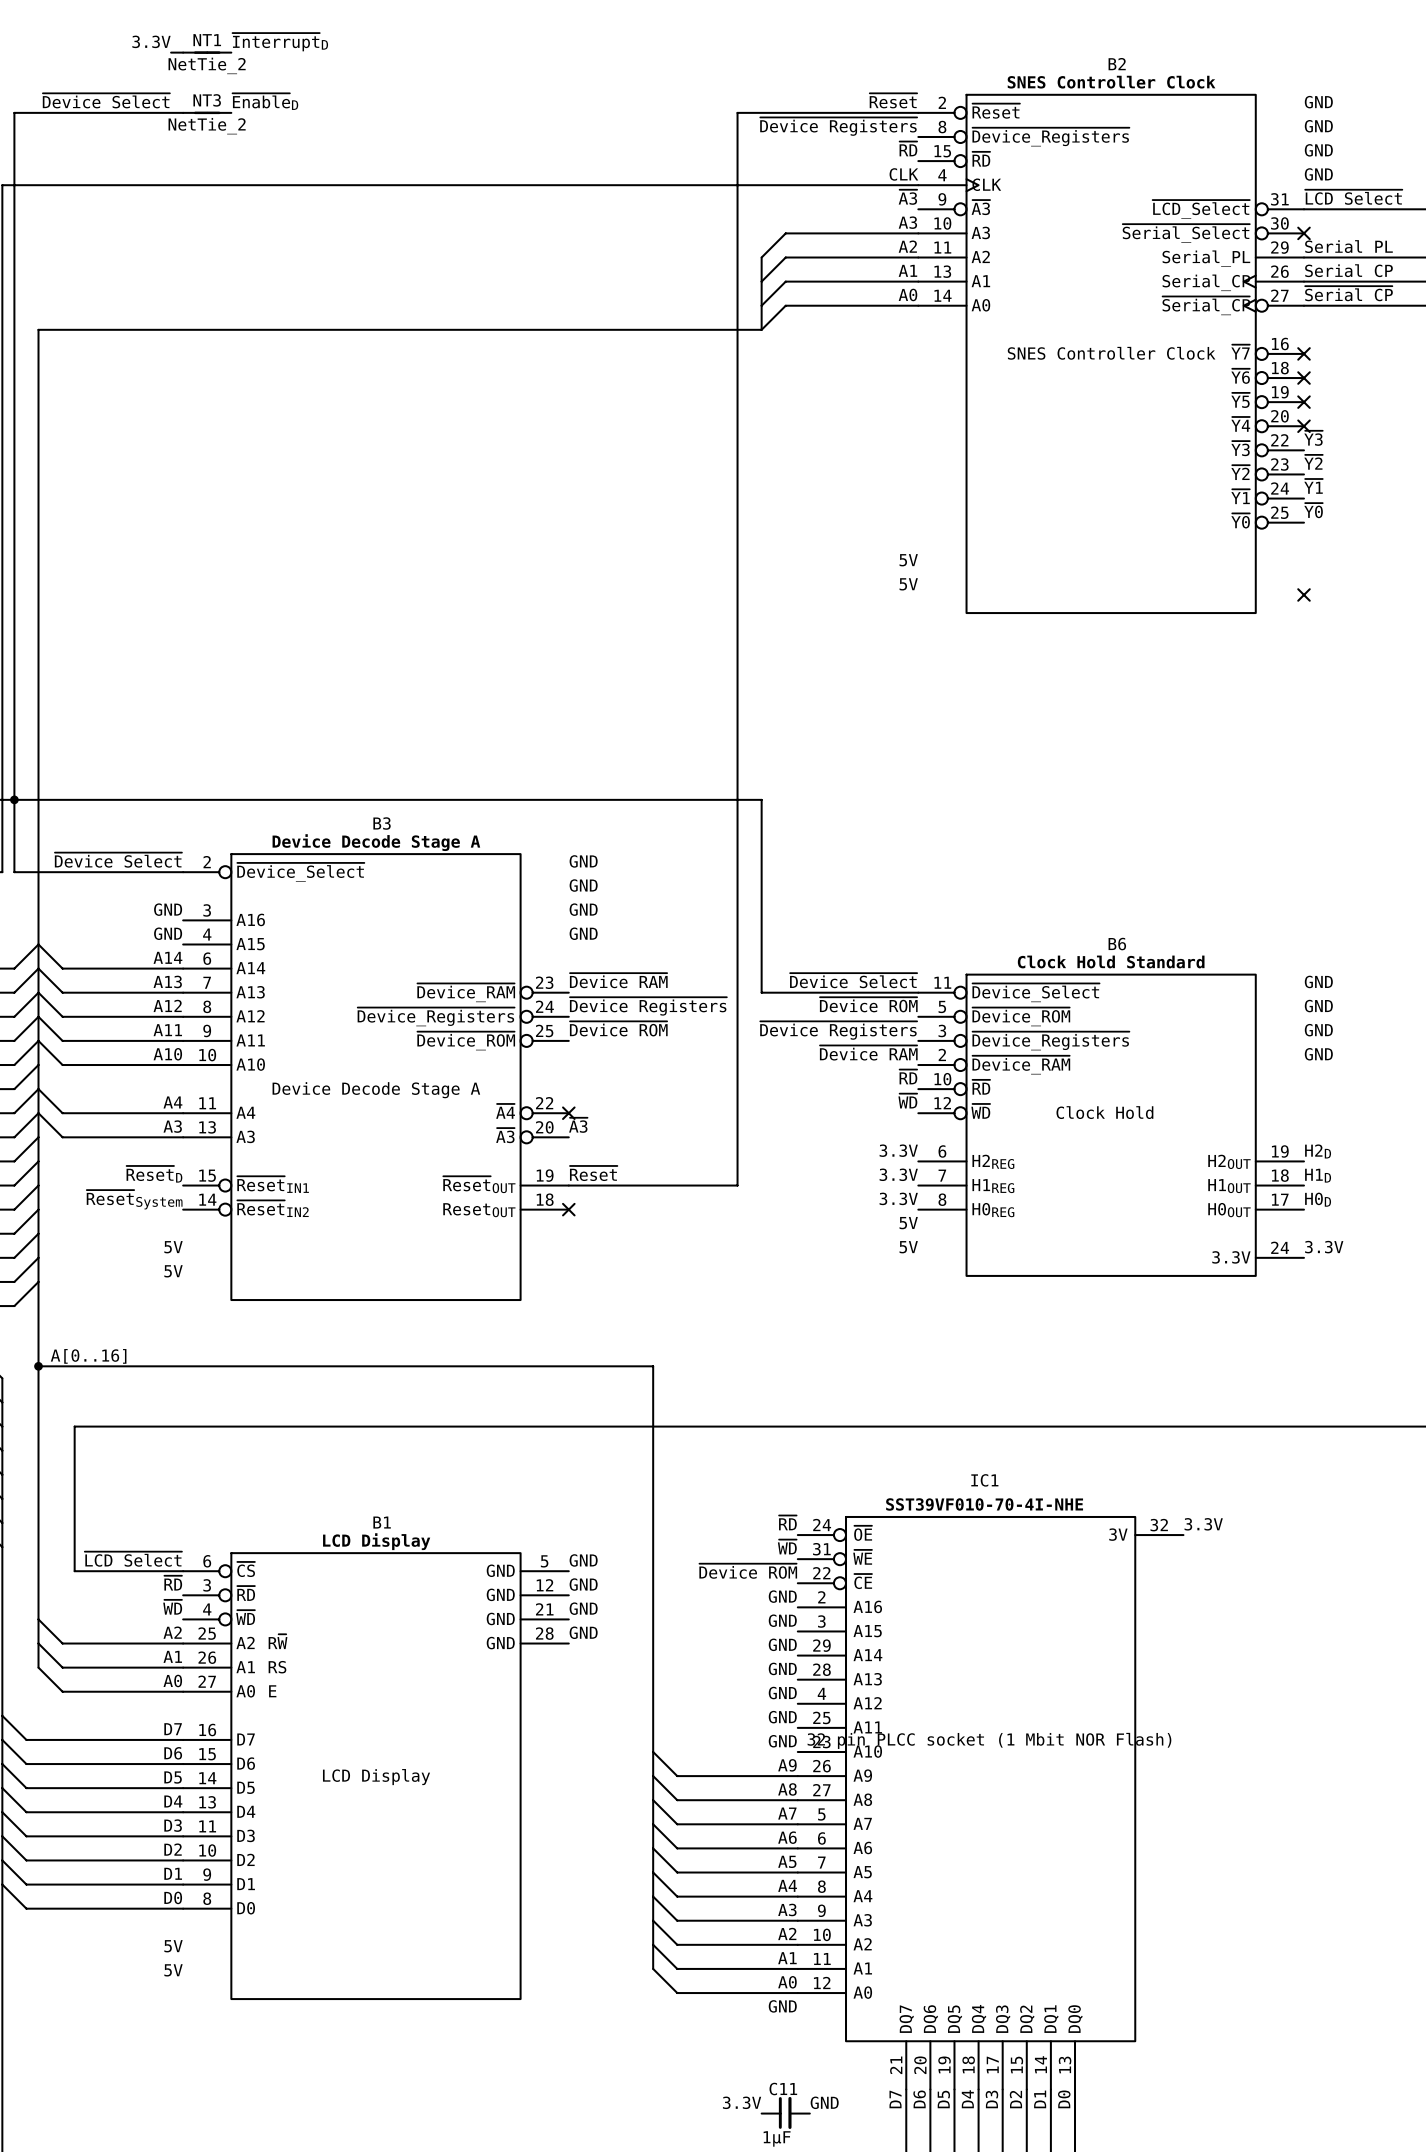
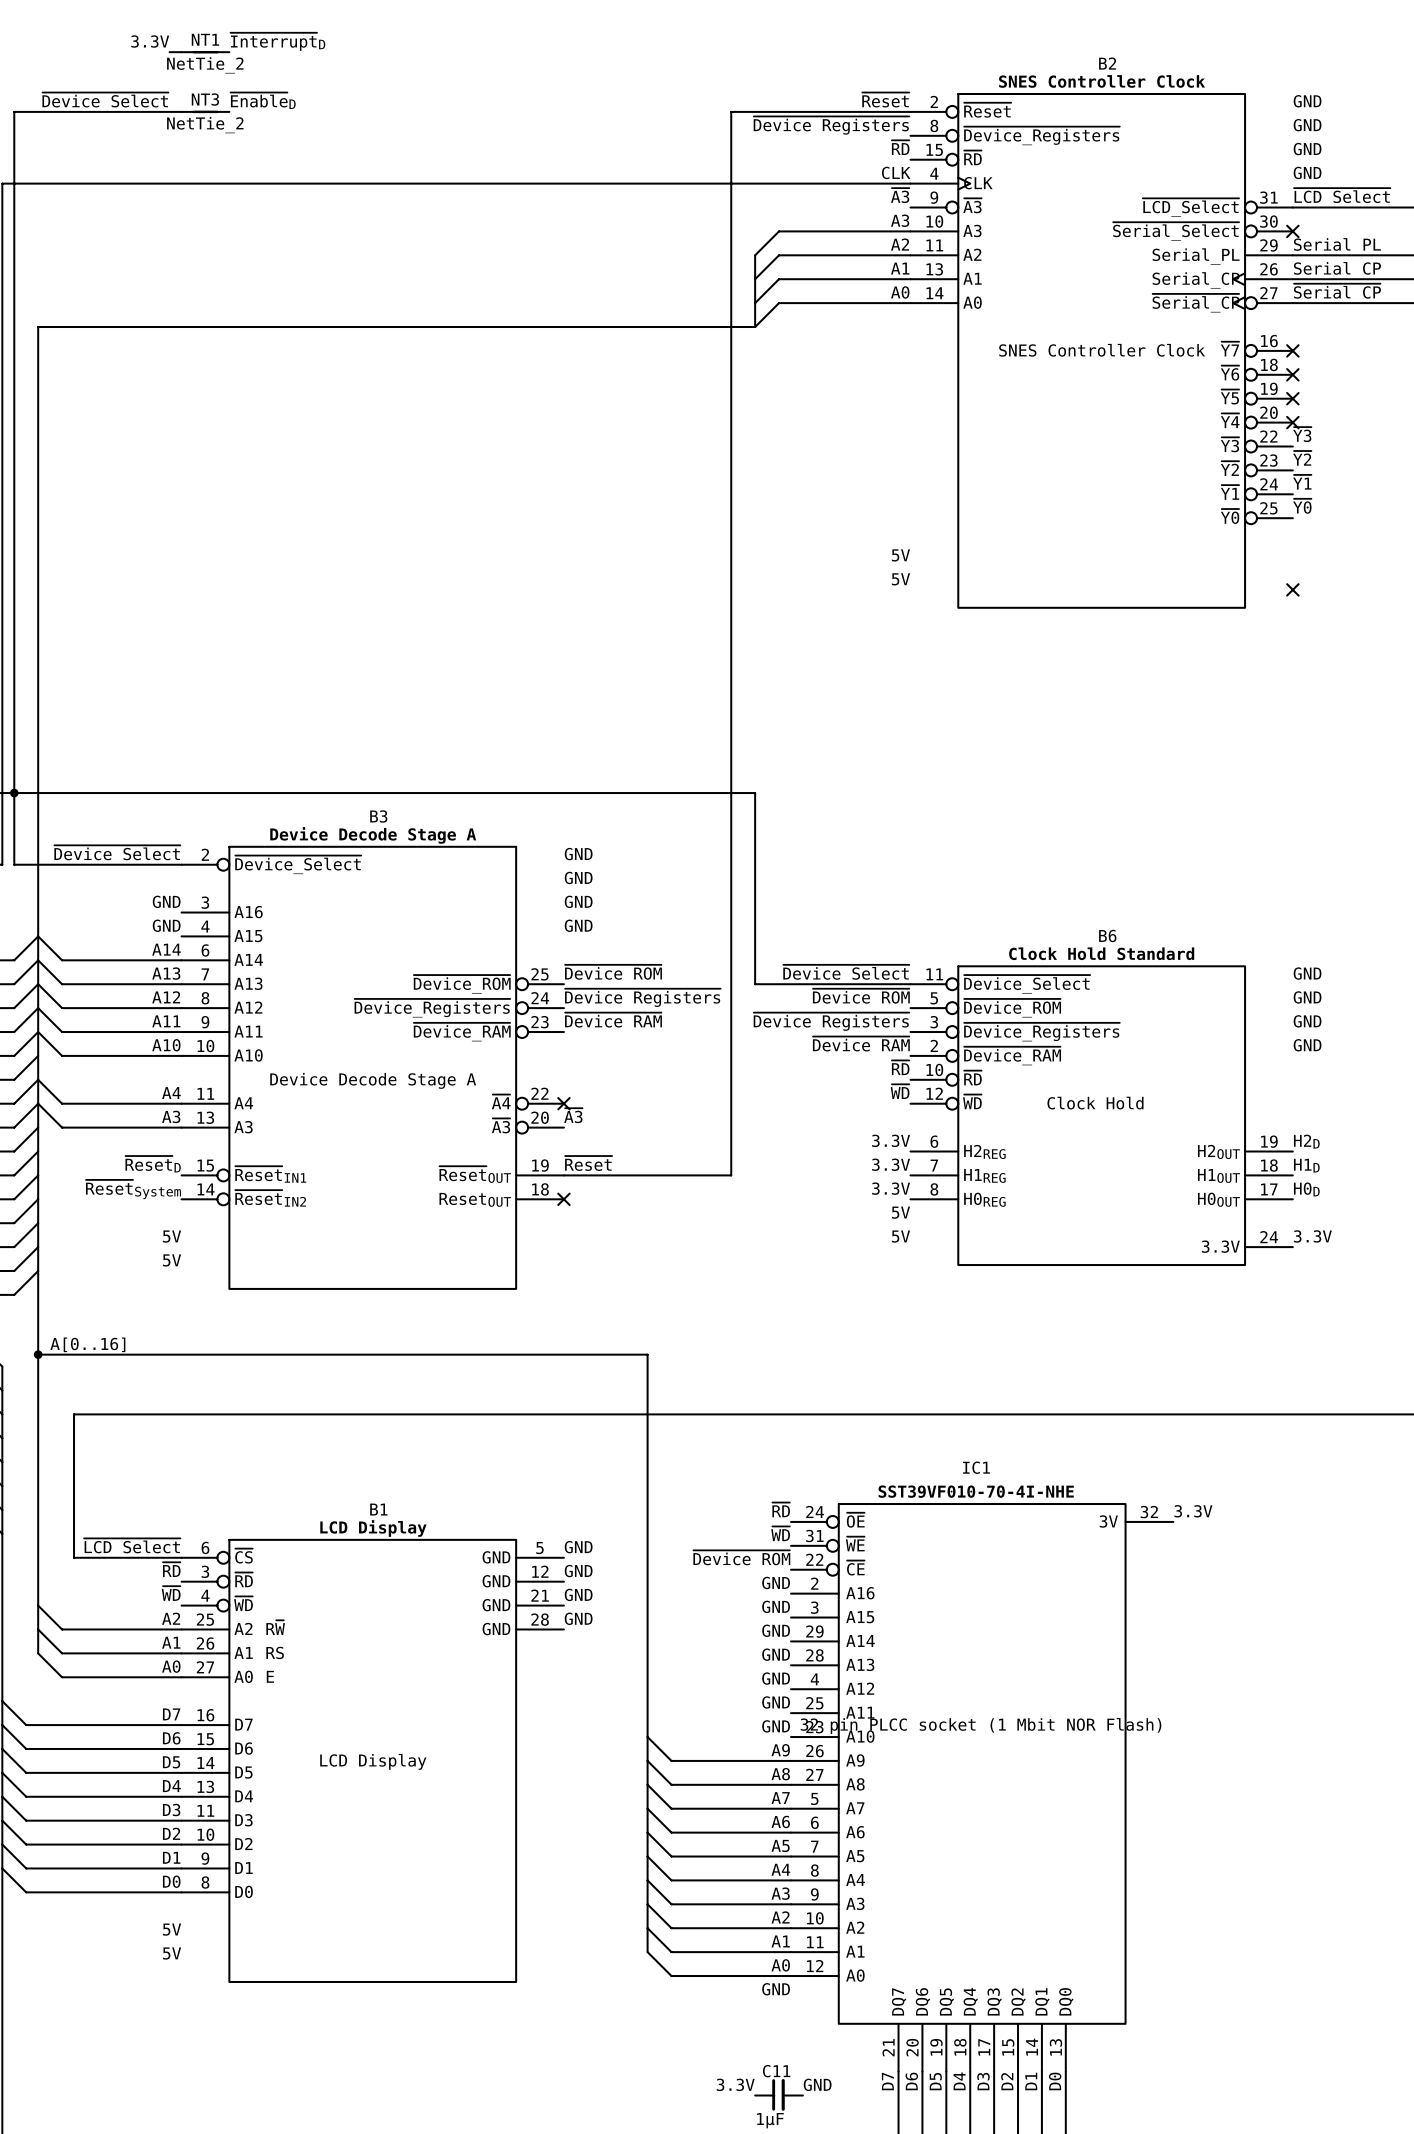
label: ~{Device RAM} (618, 980) -> ~{Device ROM} (613, 972)
B3 pin number: 23 (544, 982) -> 25 (540, 974)
B3 pin name: ~{Device_RAM} (466, 992) -> ~{Device_ROM} (462, 984)
label: ~{Device ROM} (618, 1028) -> ~{Device RAM} (613, 1020)
B3 pin number: 25 (544, 1030) -> 23 (540, 1022)
B3 pin name: ~{Device_ROM} (466, 1041) -> ~{Device_RAM} (462, 1032)

